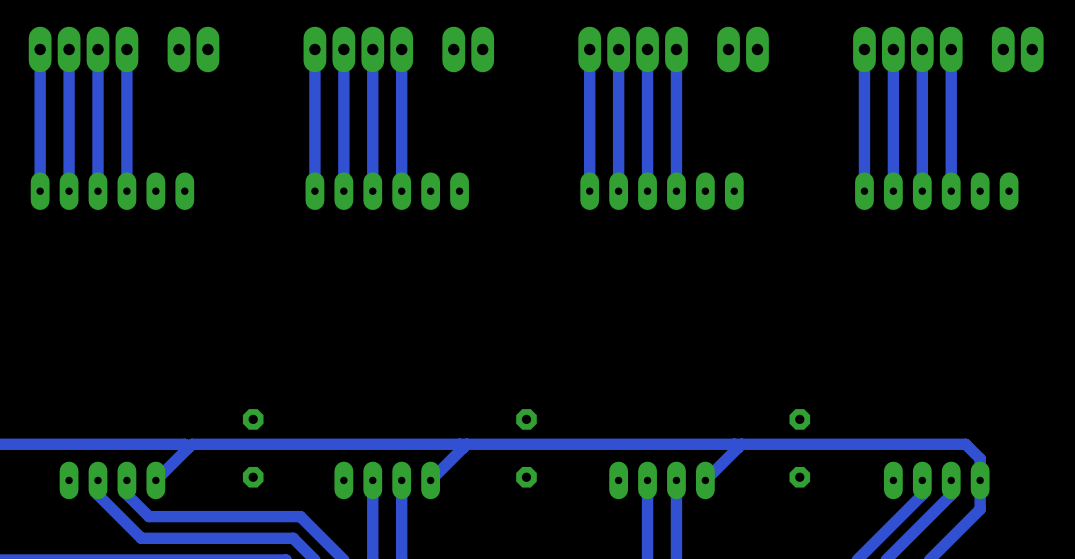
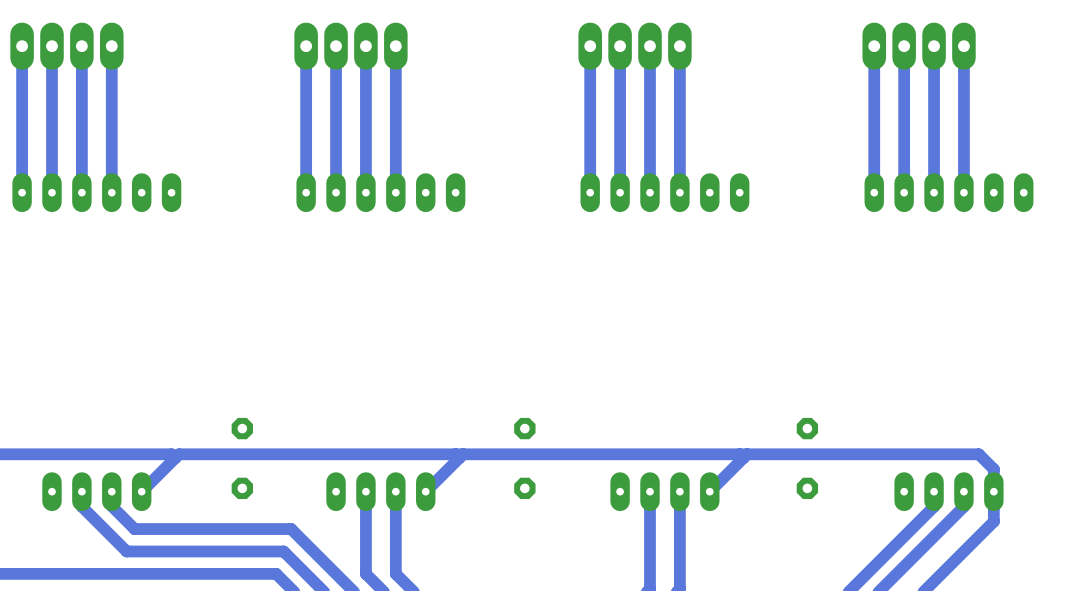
part: (193, 49) -> none
part: (468, 49) -> none
part: (742, 49) -> none
part: (1017, 49) -> none

